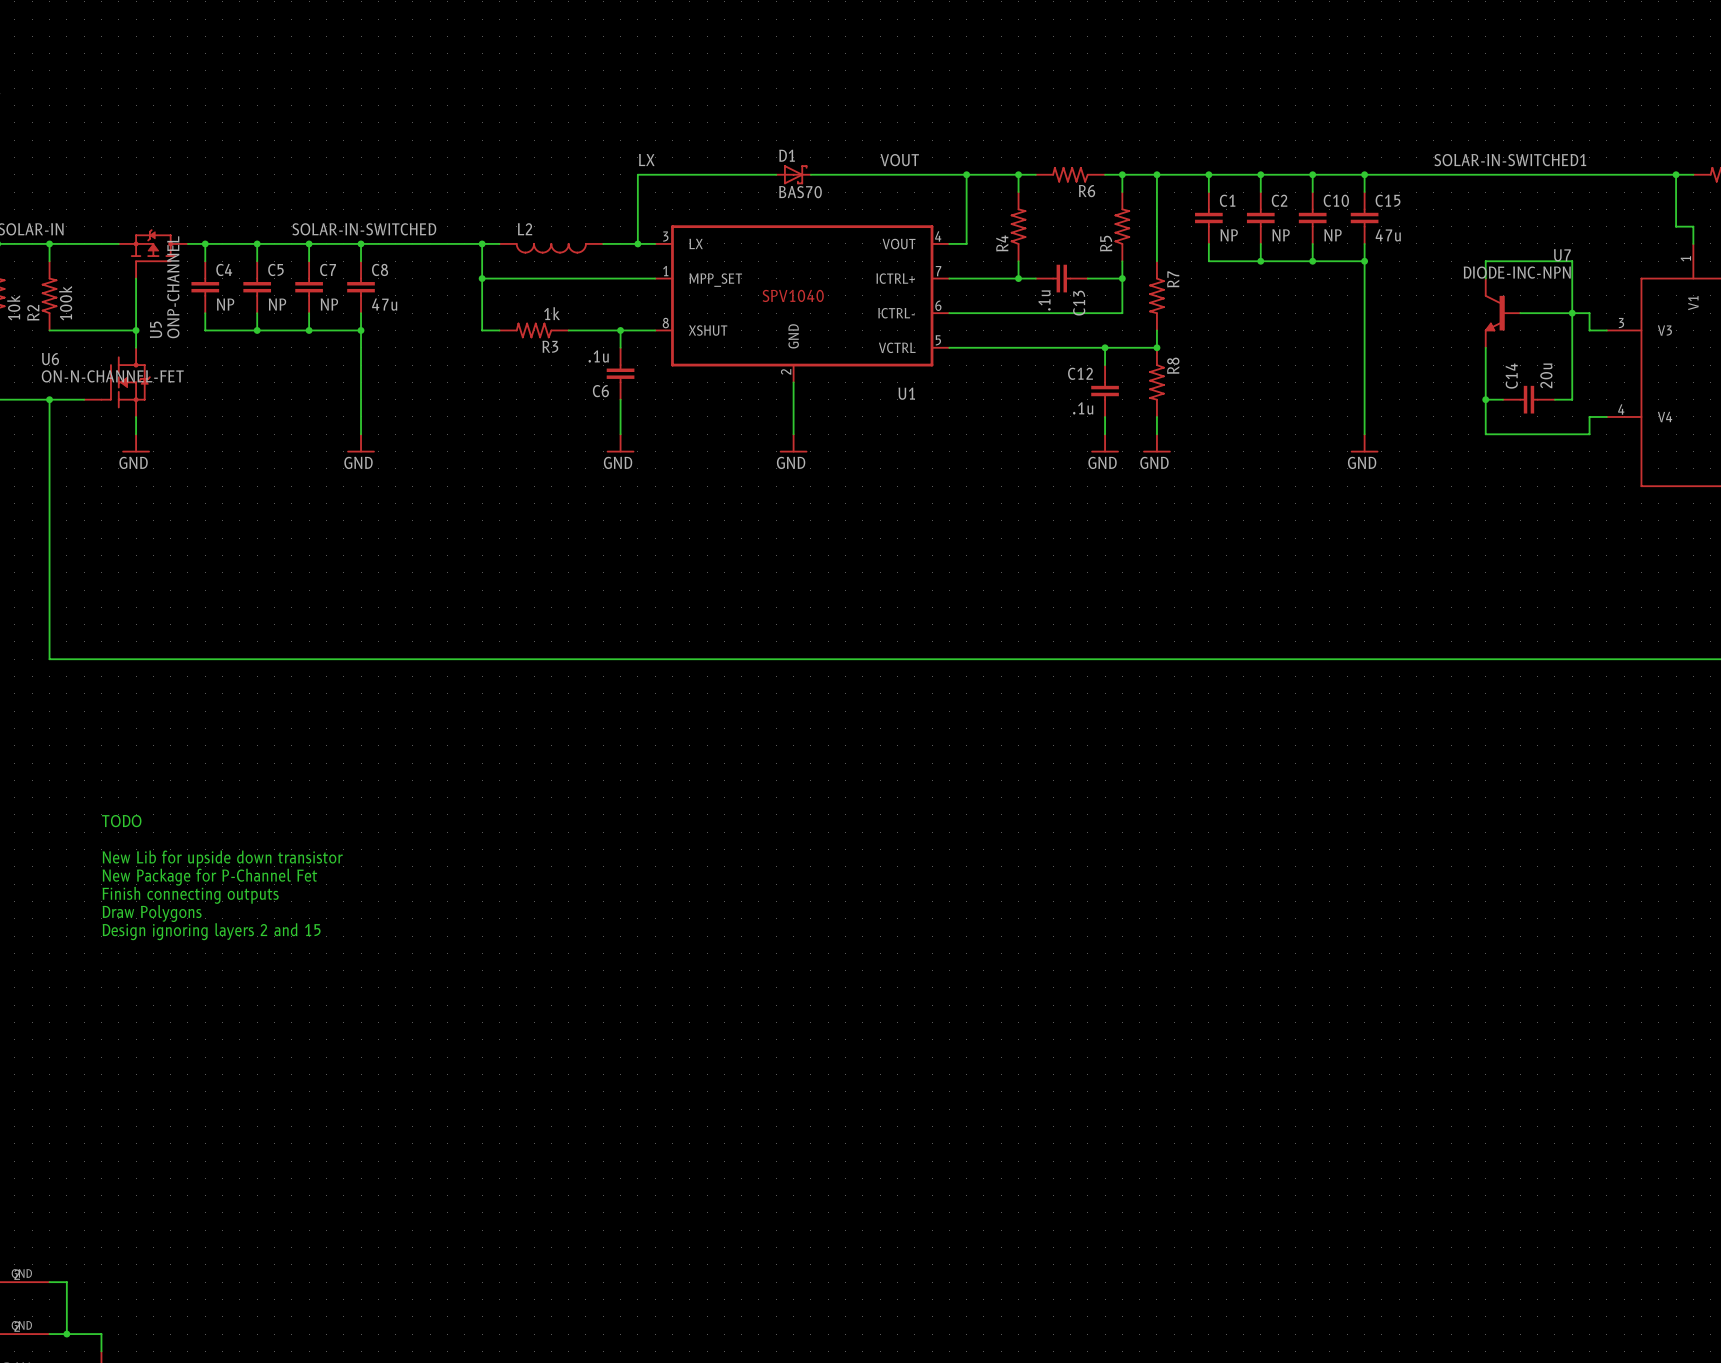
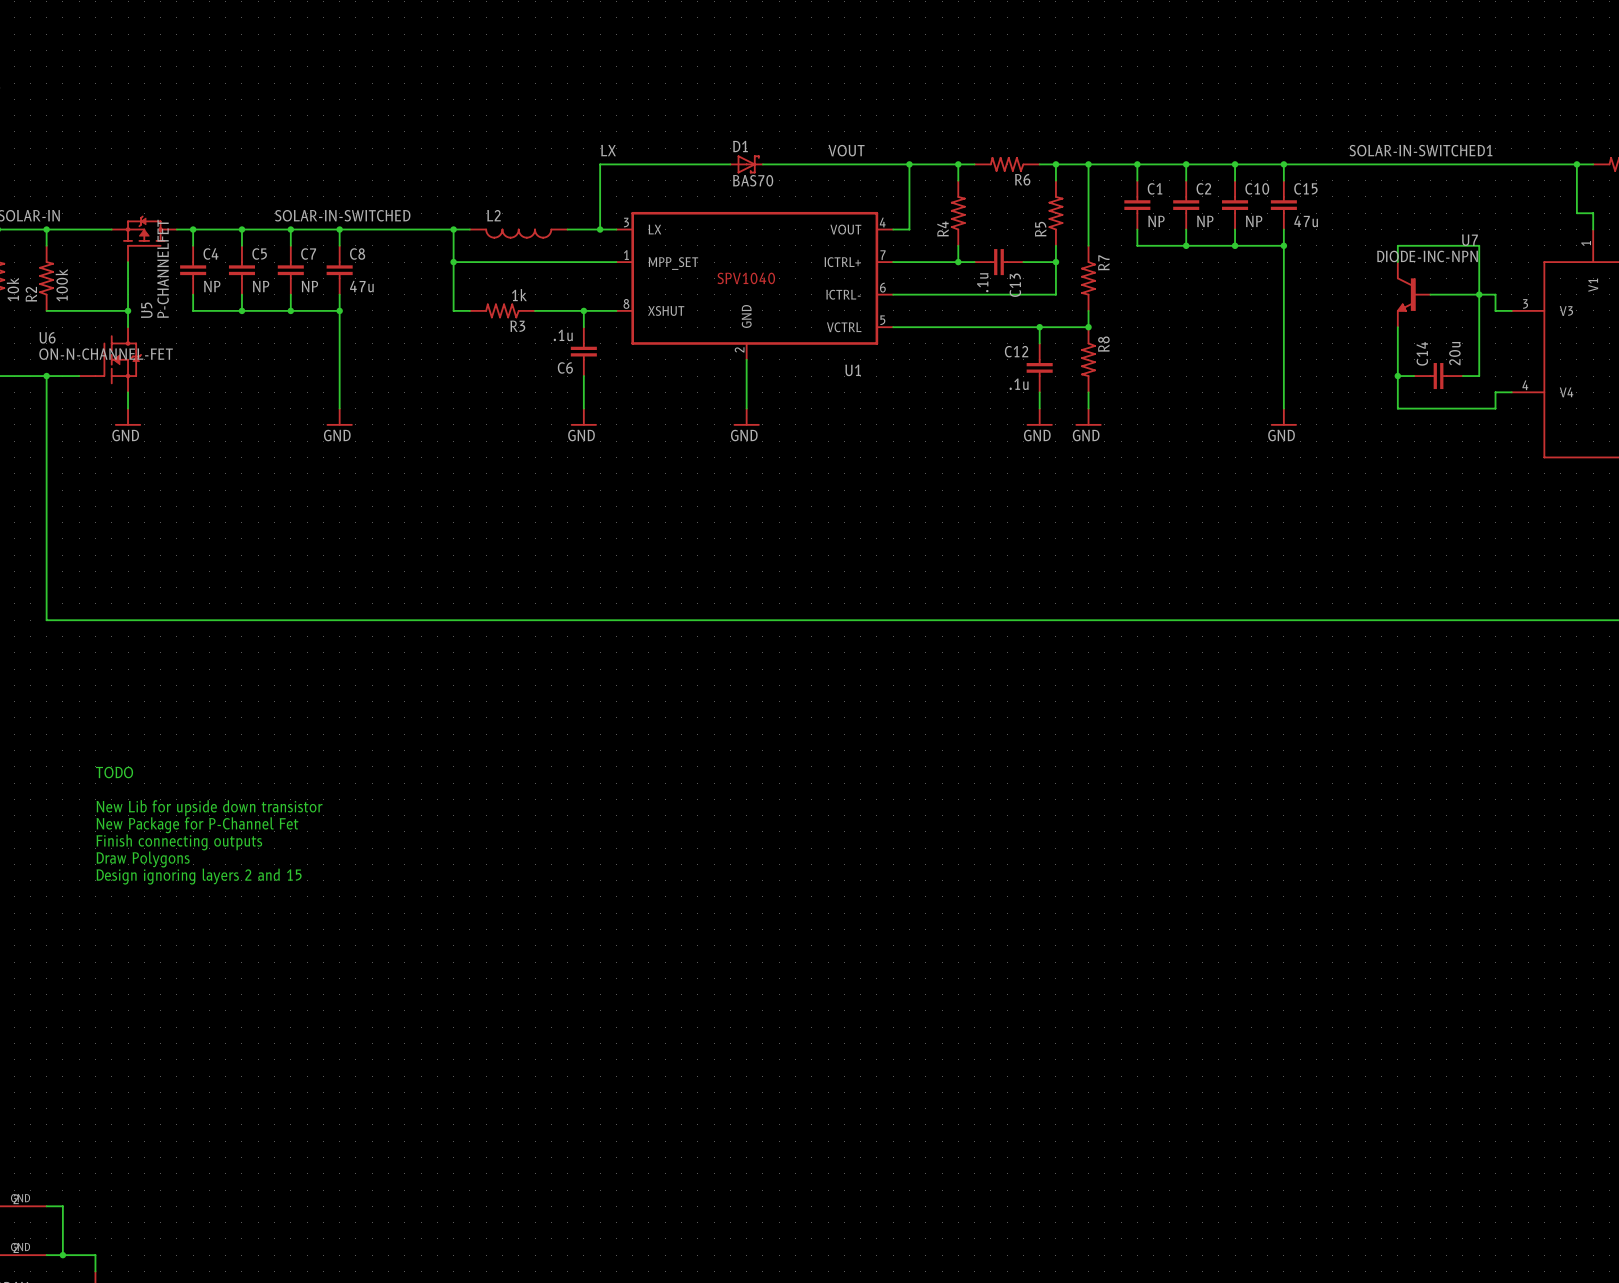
U5 value: ONP-CHANNEL (173, 287) -> P-CHANNELFET (163, 268)

